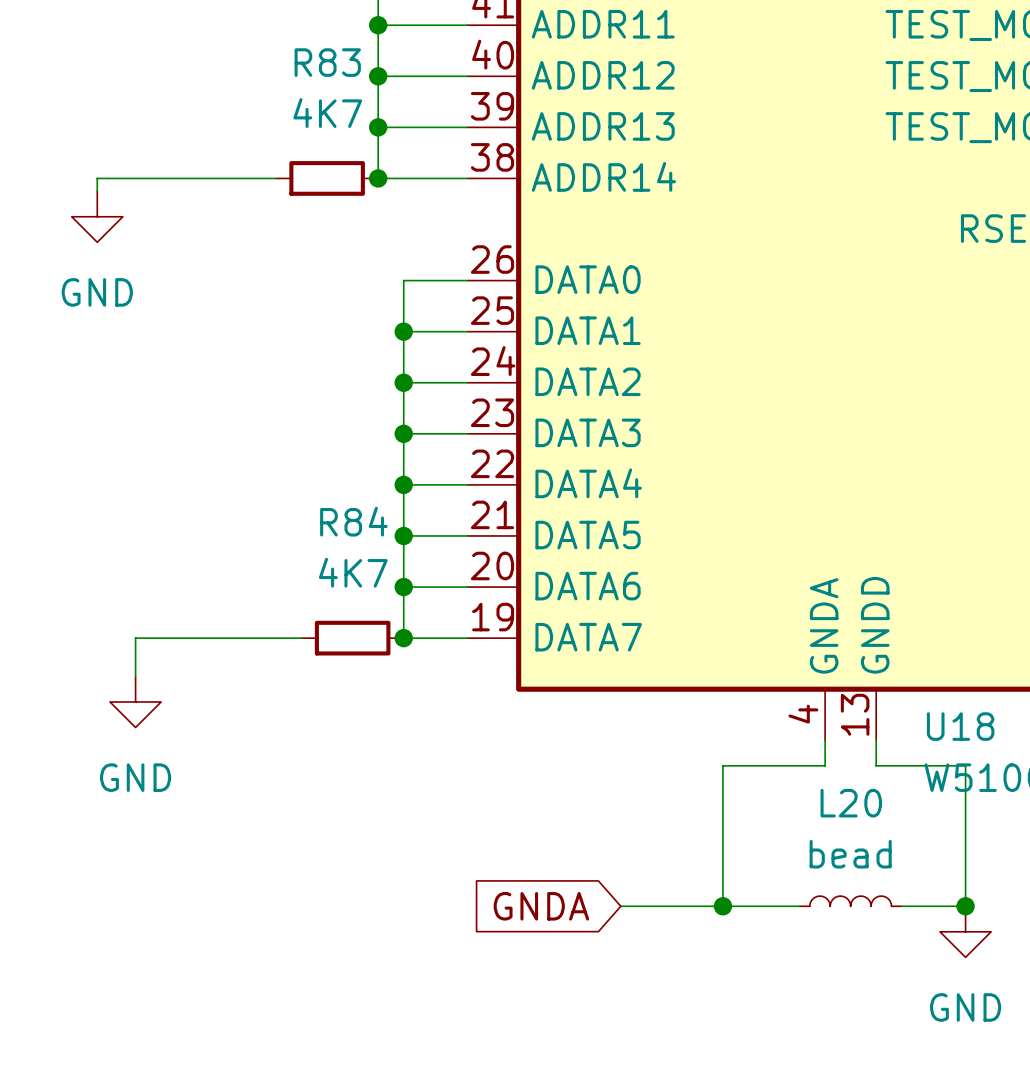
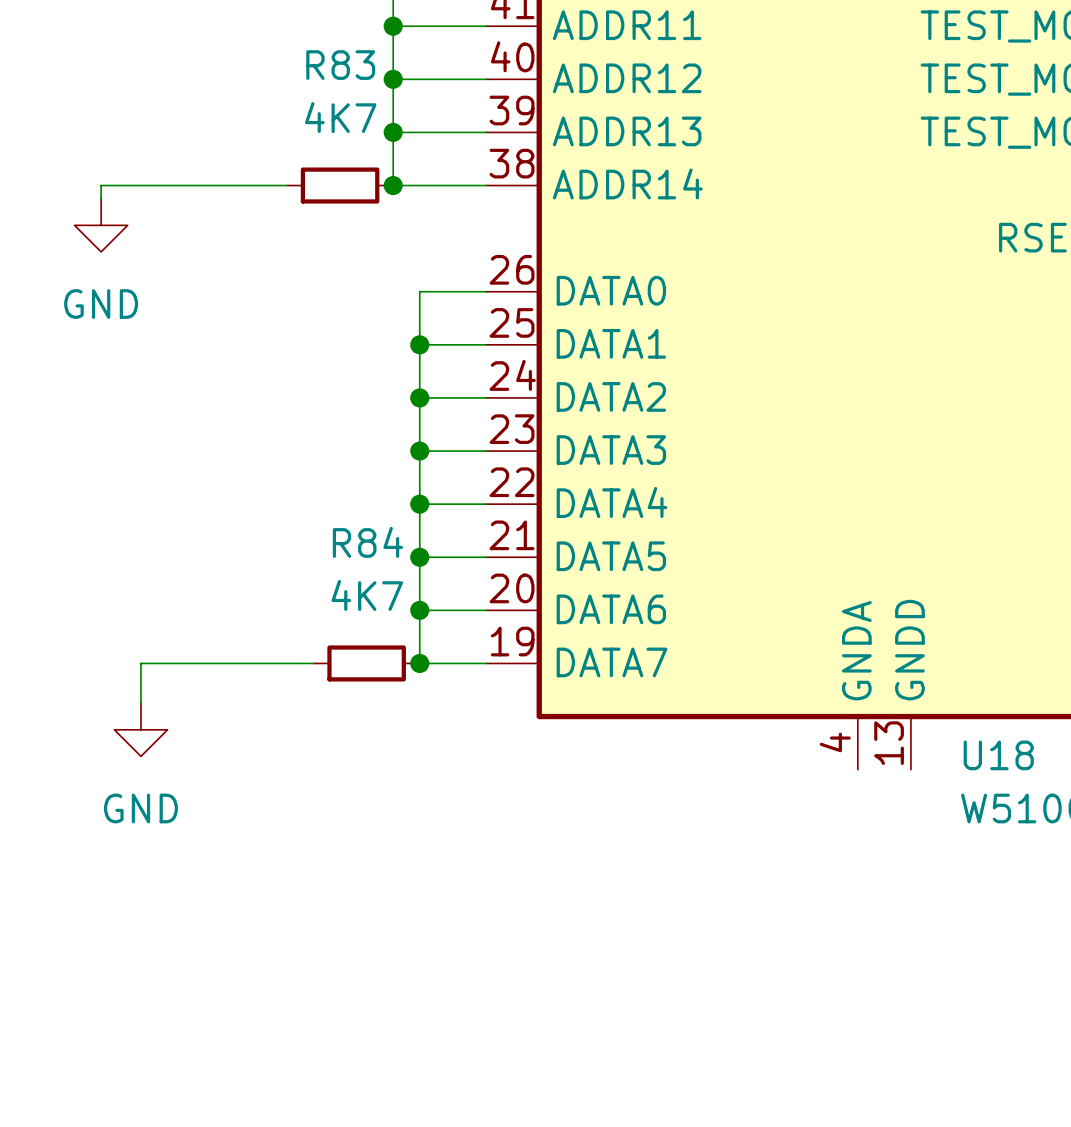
wire: (825, 740) (825, 765) (722, 765) (722, 906) -> none
wire: (876, 740) (876, 765) (965, 765) (965, 906) (901, 906) -> none
L20: bead (850, 901) -> none
global label: GNDA (541, 906) -> none
wire: (620, 906) (799, 906) -> none
junction: (722, 906) -> none
junction: (965, 906) -> none
power symbol: GND (965, 931) -> none

